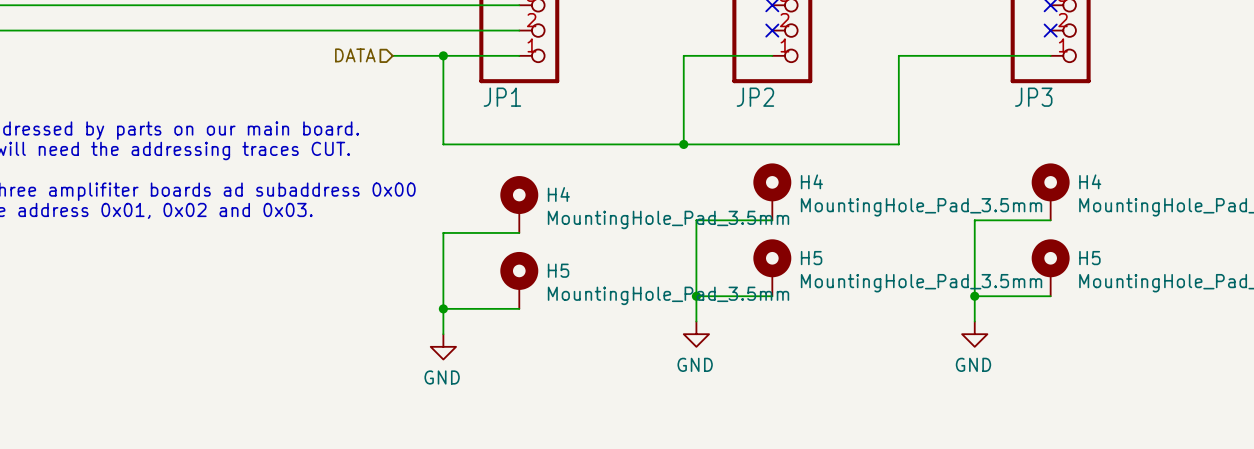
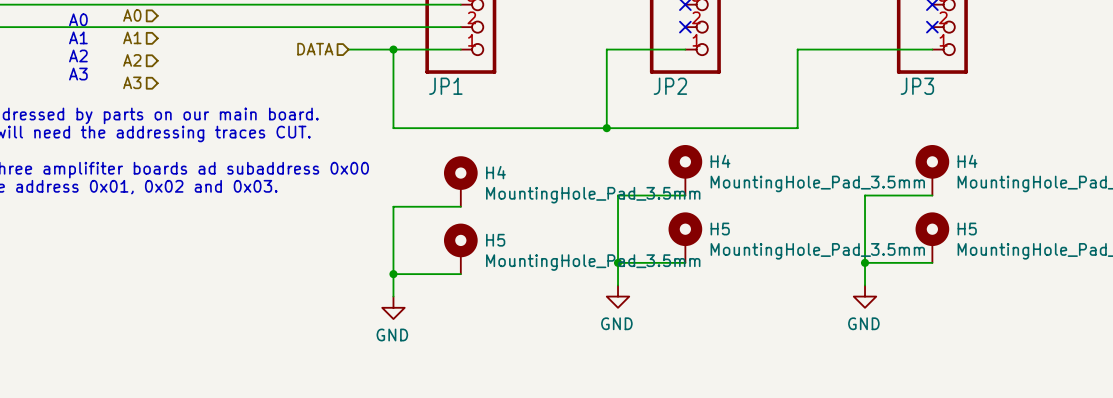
hierarchical label: none -> A0 (132, 15)
text: none -> A0 (78, 19)
text: none -> A1 (78, 37)
hierarchical label: none -> A1 (132, 37)
text: none -> A2 (78, 55)
hierarchical label: none -> A2 (132, 60)
text: none -> A3 (78, 74)
hierarchical label: none -> A3 (132, 82)

